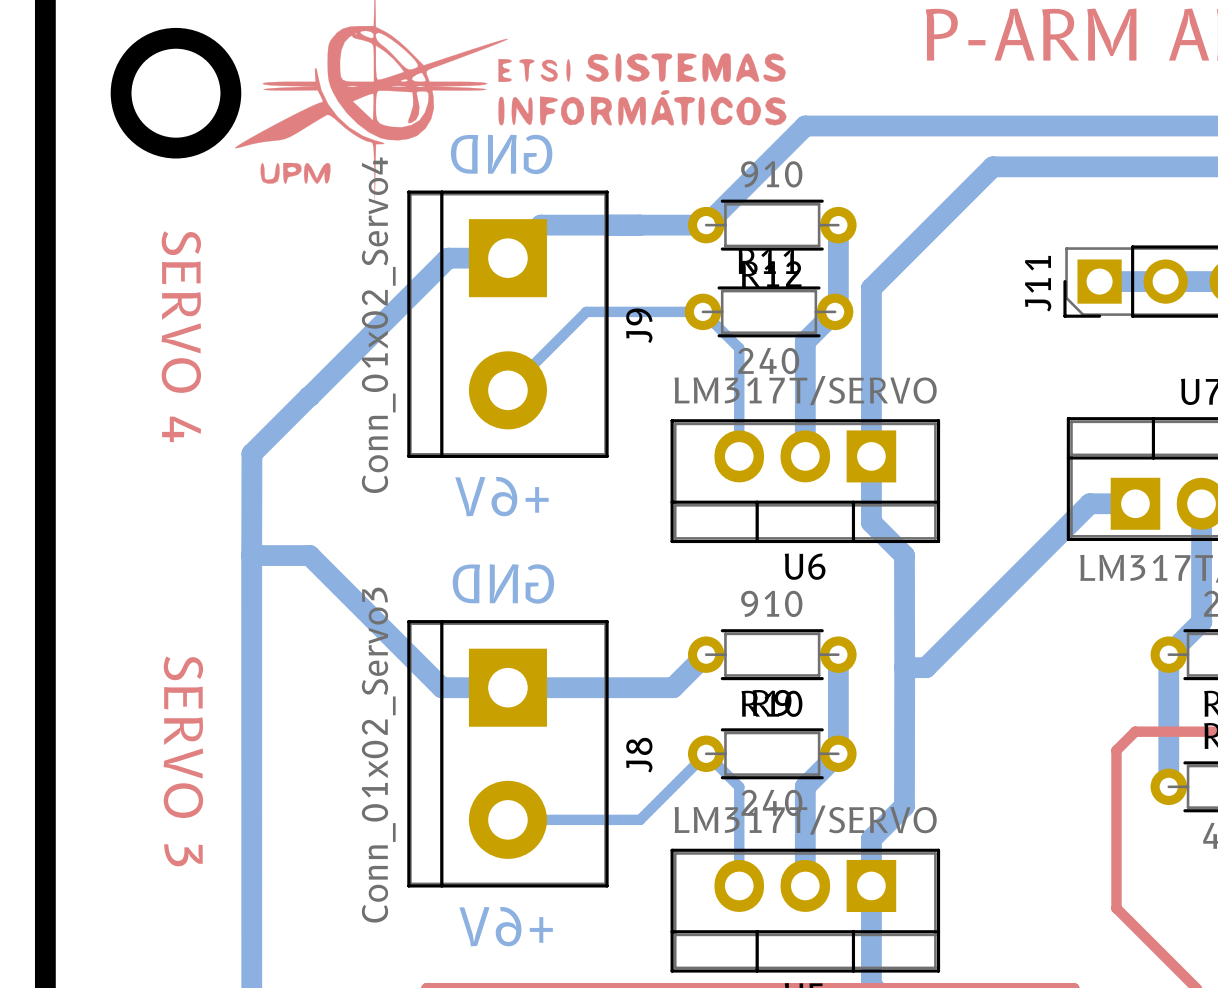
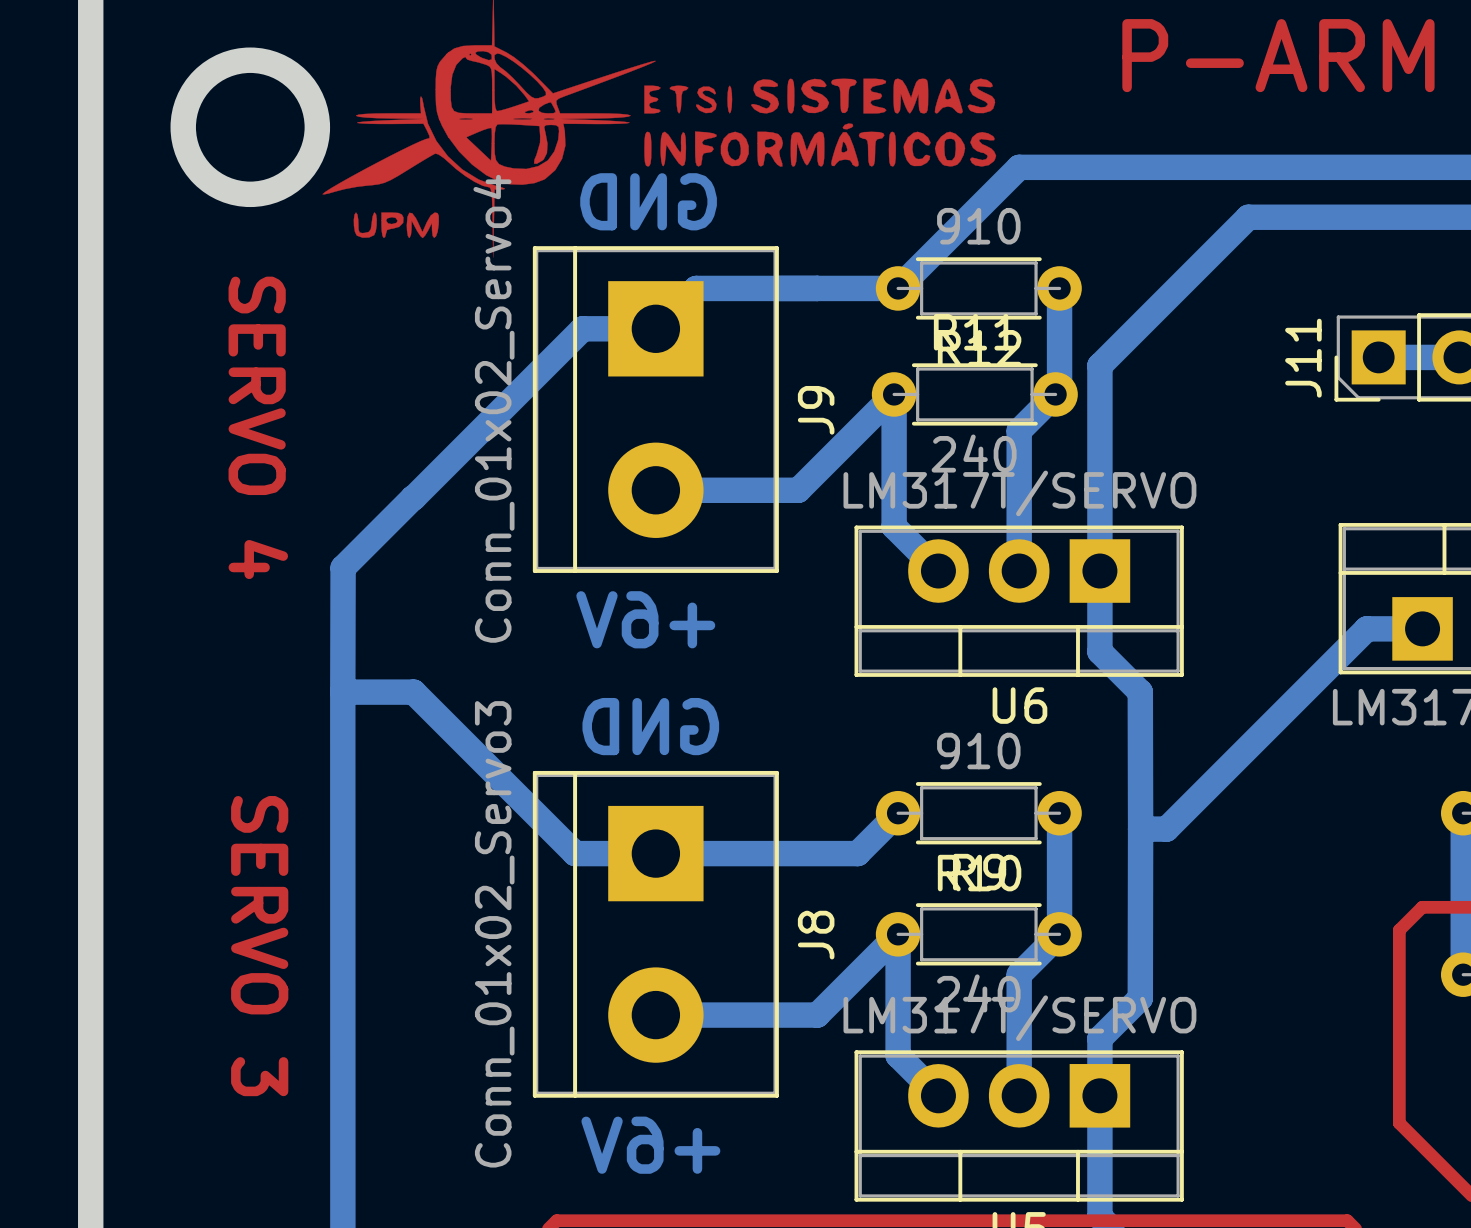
bottom track: (507, 390) (586, 311) (702, 311) (739, 348) (739, 456) -> (655, 490) (798, 490) (894, 394) (894, 526) (938, 571)
bottom track: (706, 753) (739, 786) (739, 885) -> (898, 934) (898, 1055) (938, 1095)
bottom track width: thin (706, 753) (640, 819) (507, 819) -> thick (898, 934) (817, 1015) (655, 1015)

